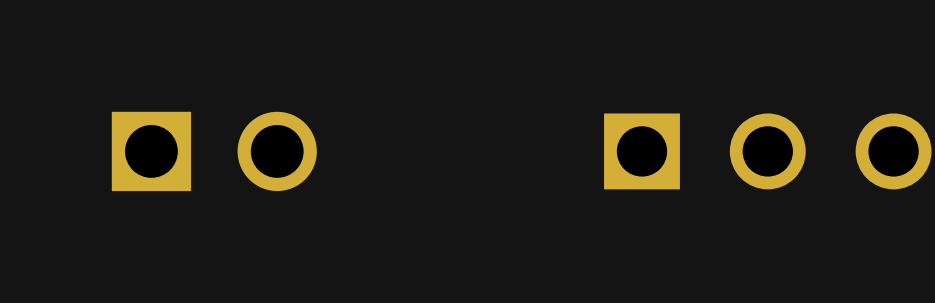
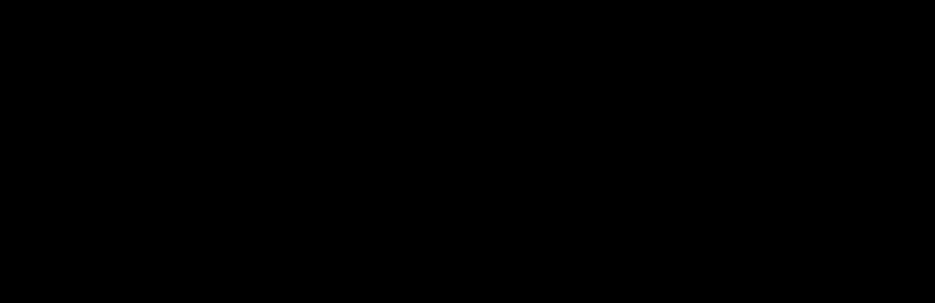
part: (214, 151) -> none
part: (767, 151) -> none

